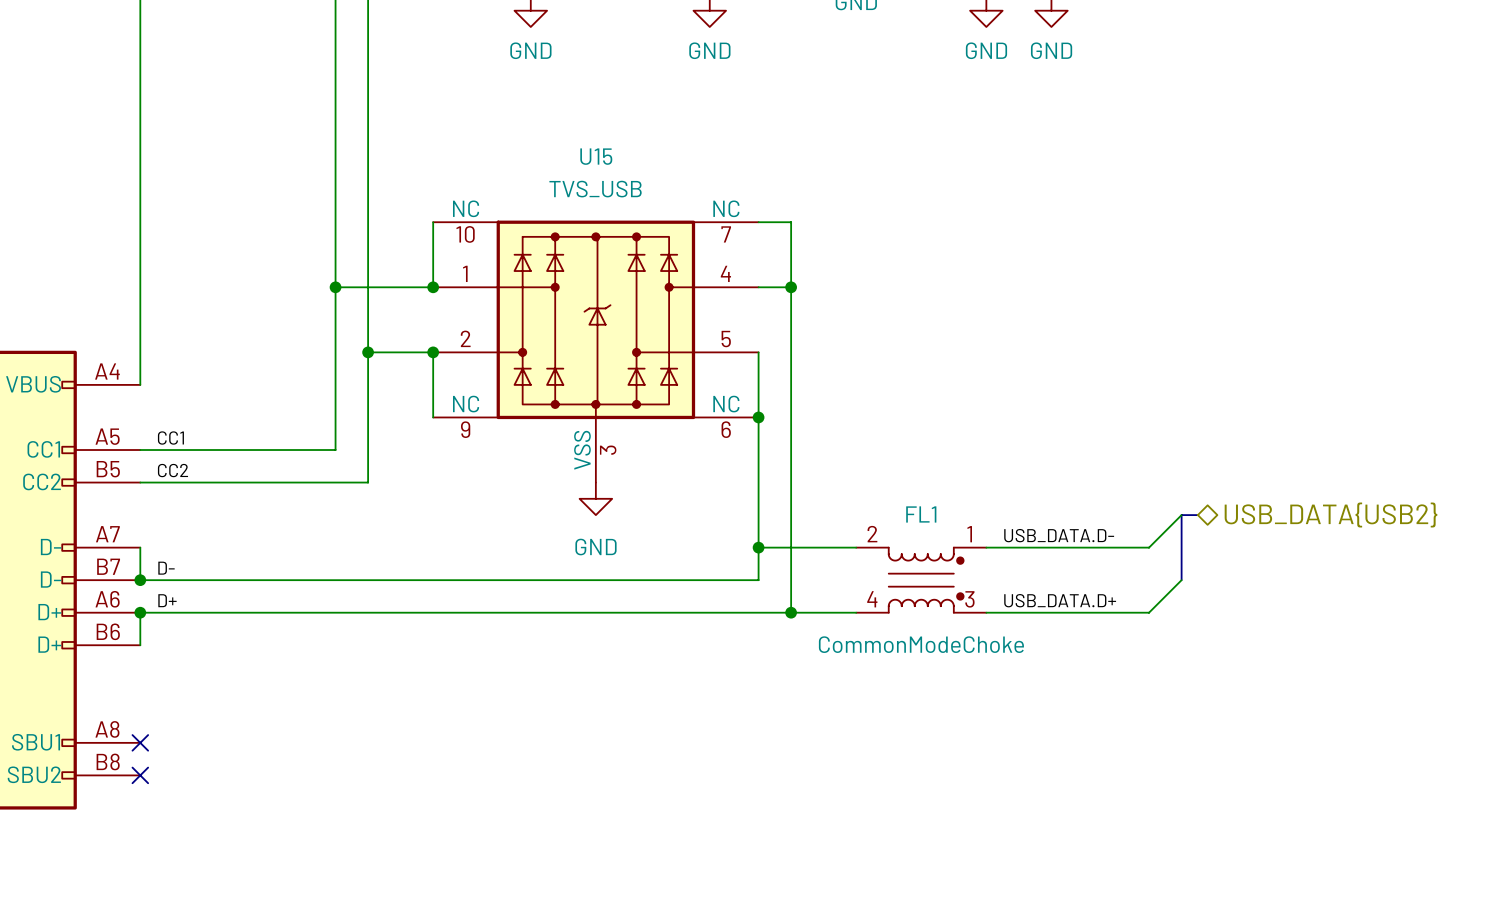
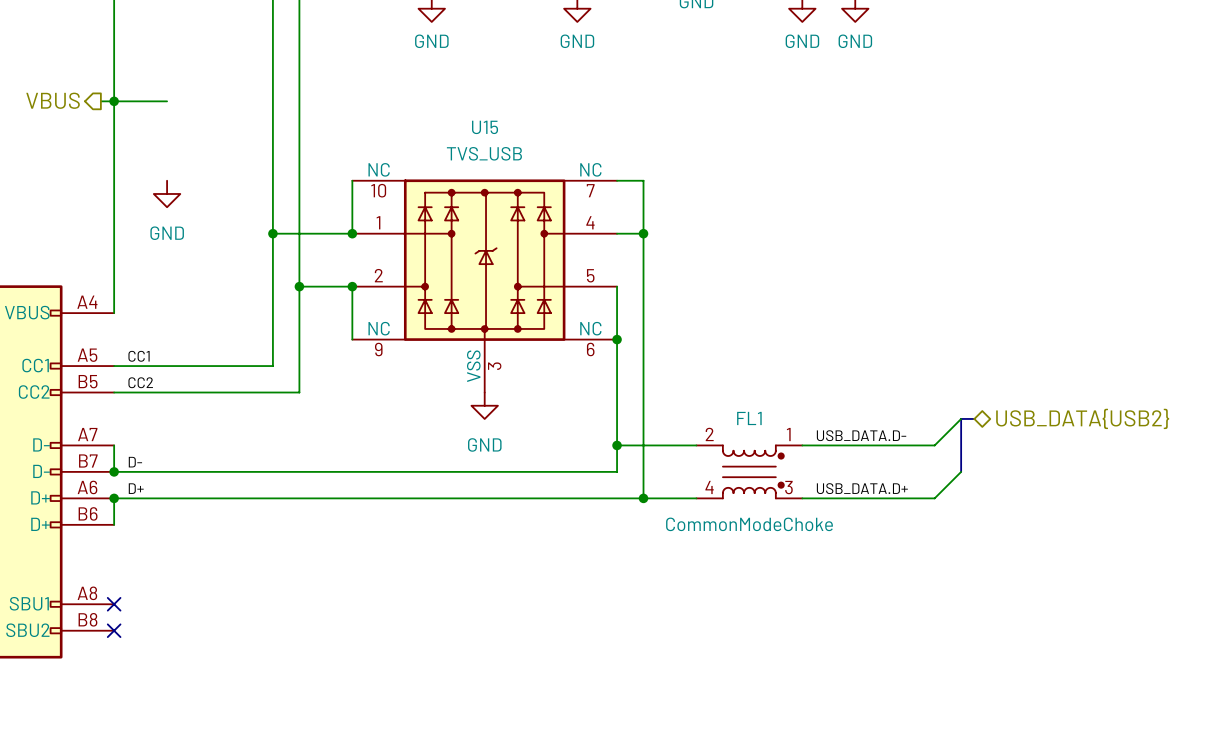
hierarchical label: none -> VBUS (53, 100)
wire: none -> (100, 101) (167, 101)
junction: none -> (114, 101)
power symbol: none -> GND (167, 193)

